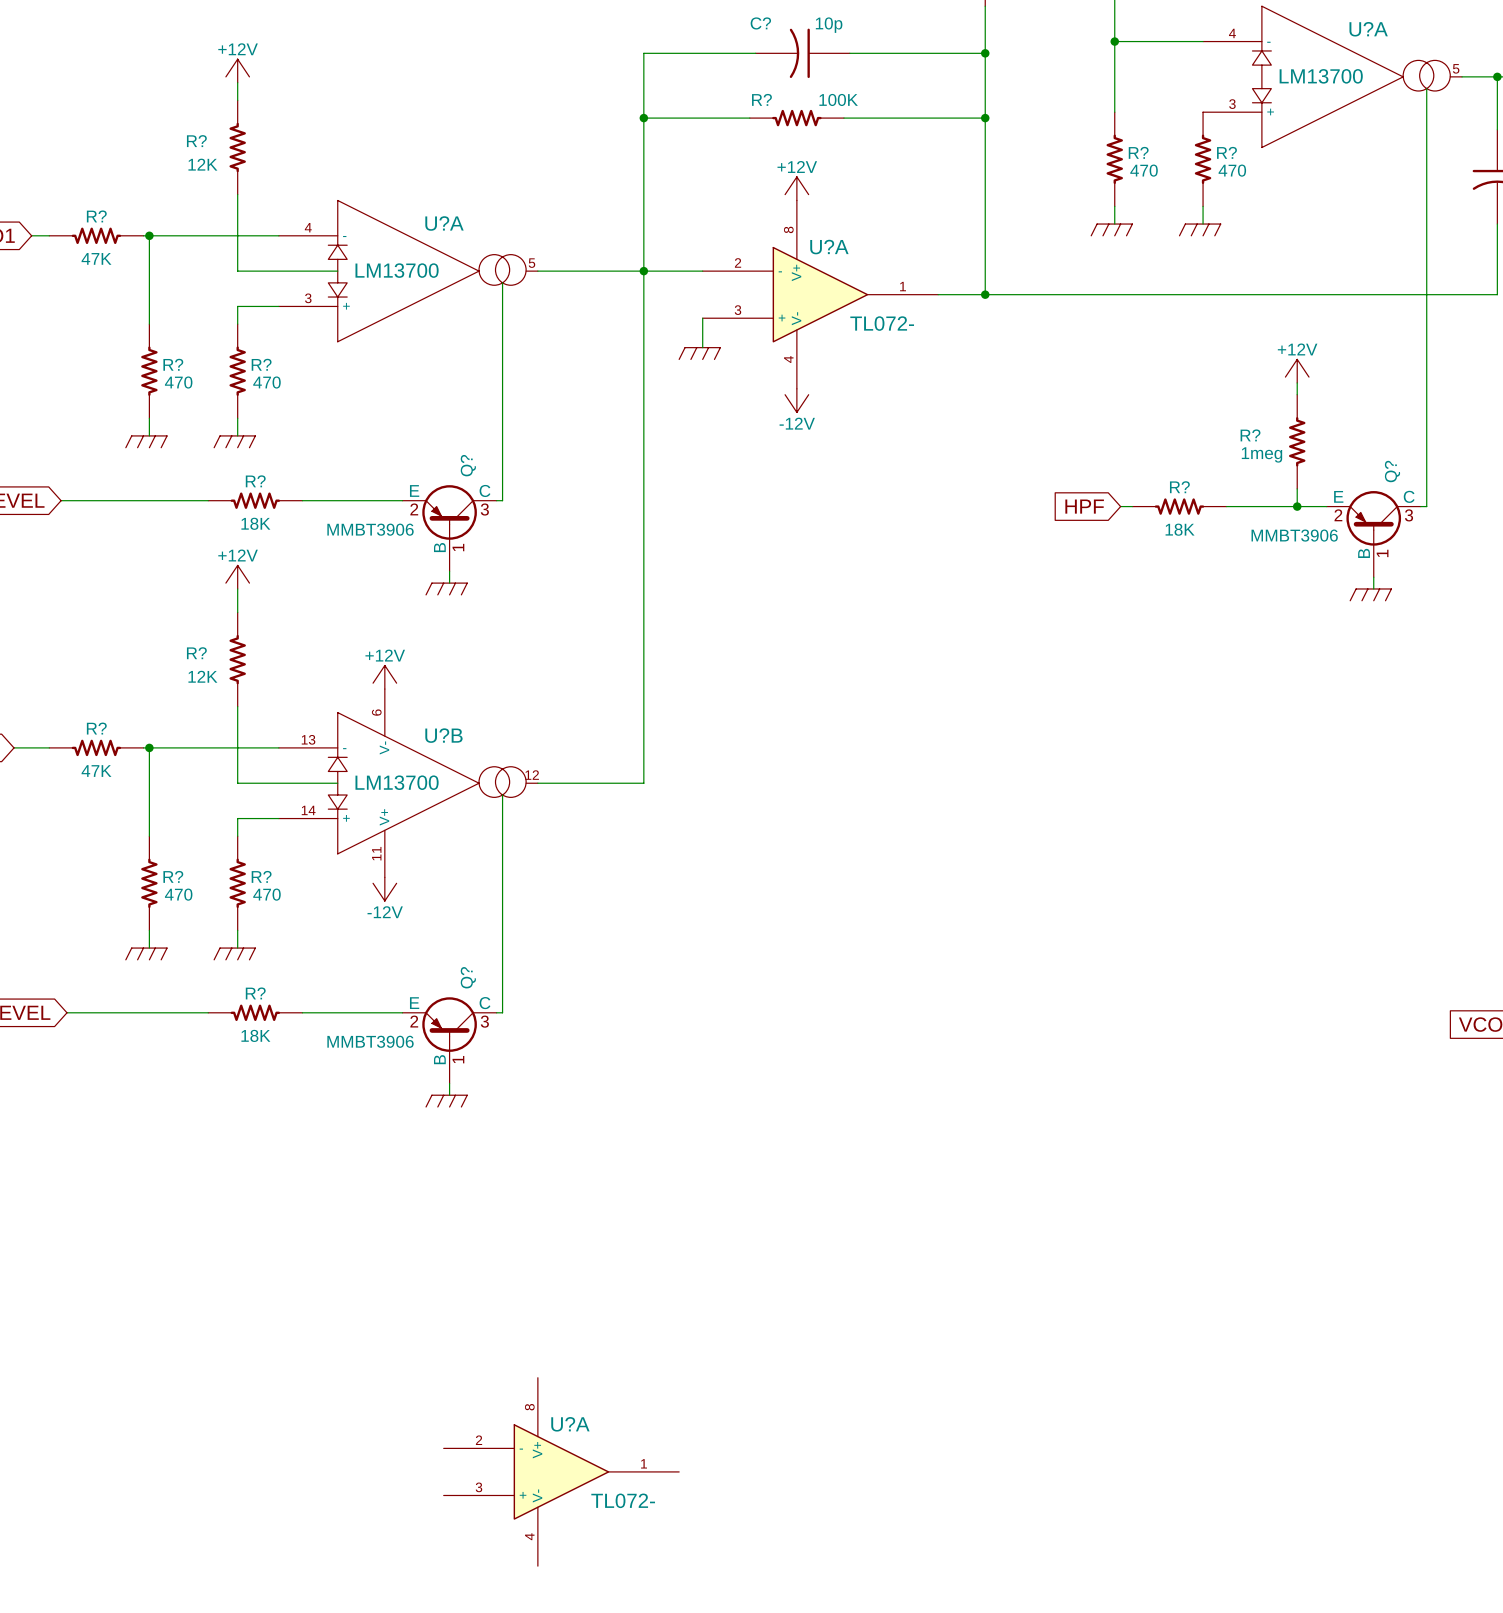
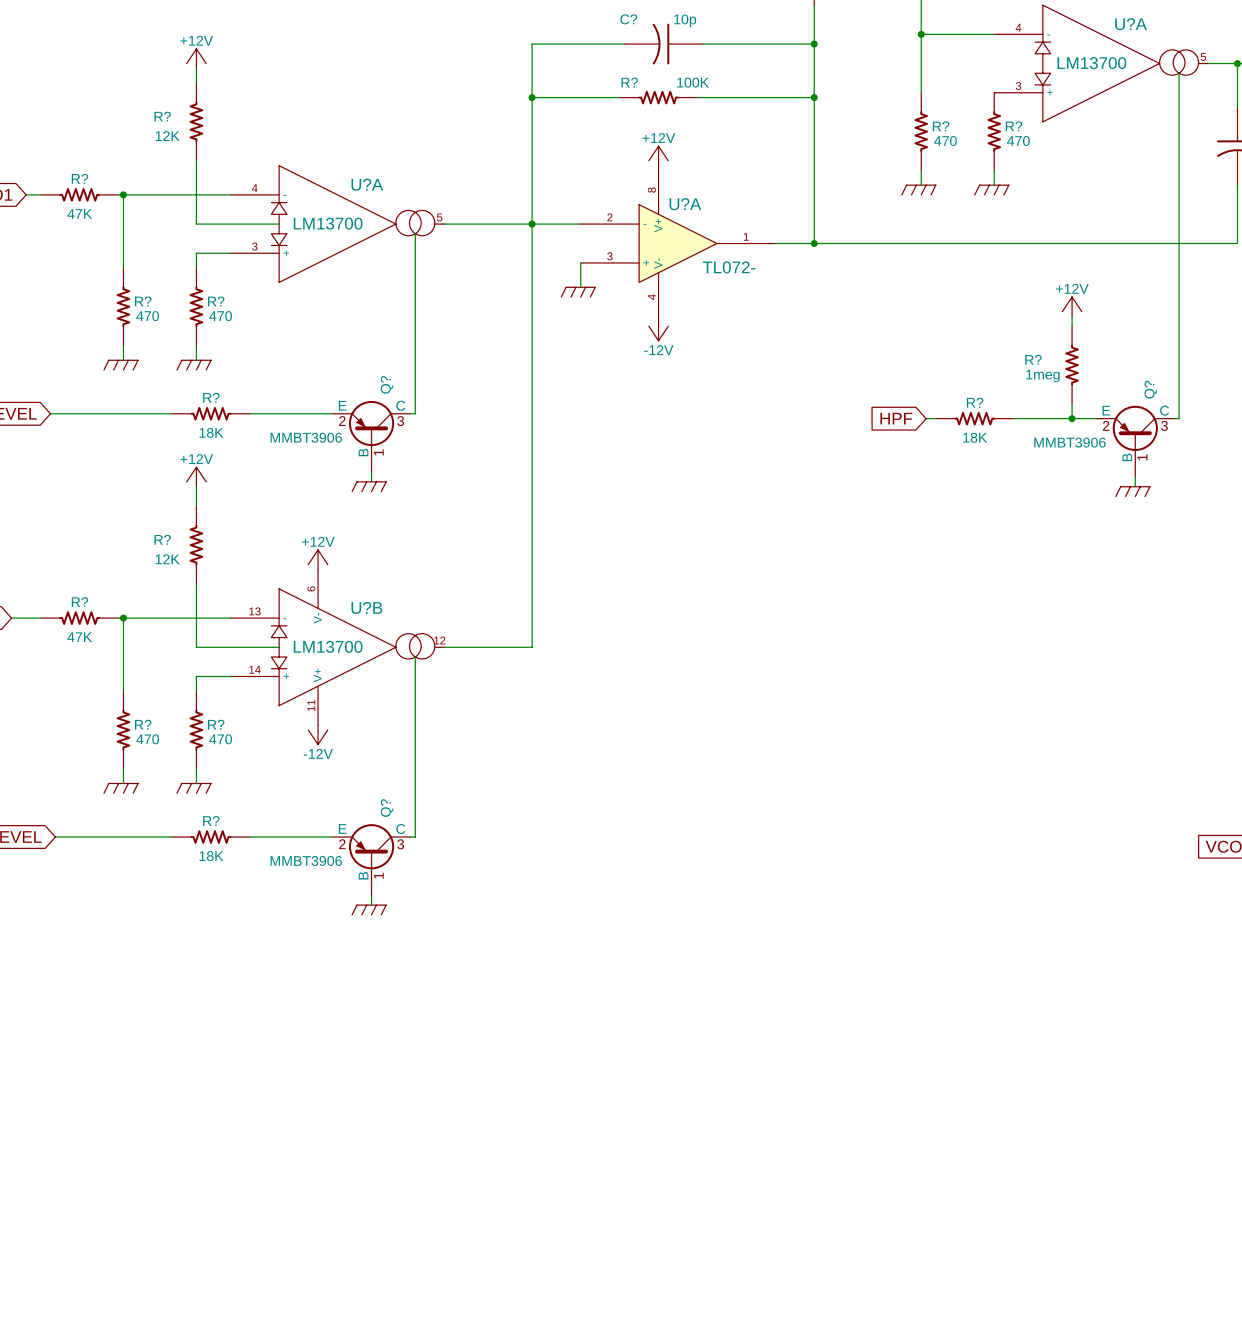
U?A: TL072- (561, 1471) -> none

